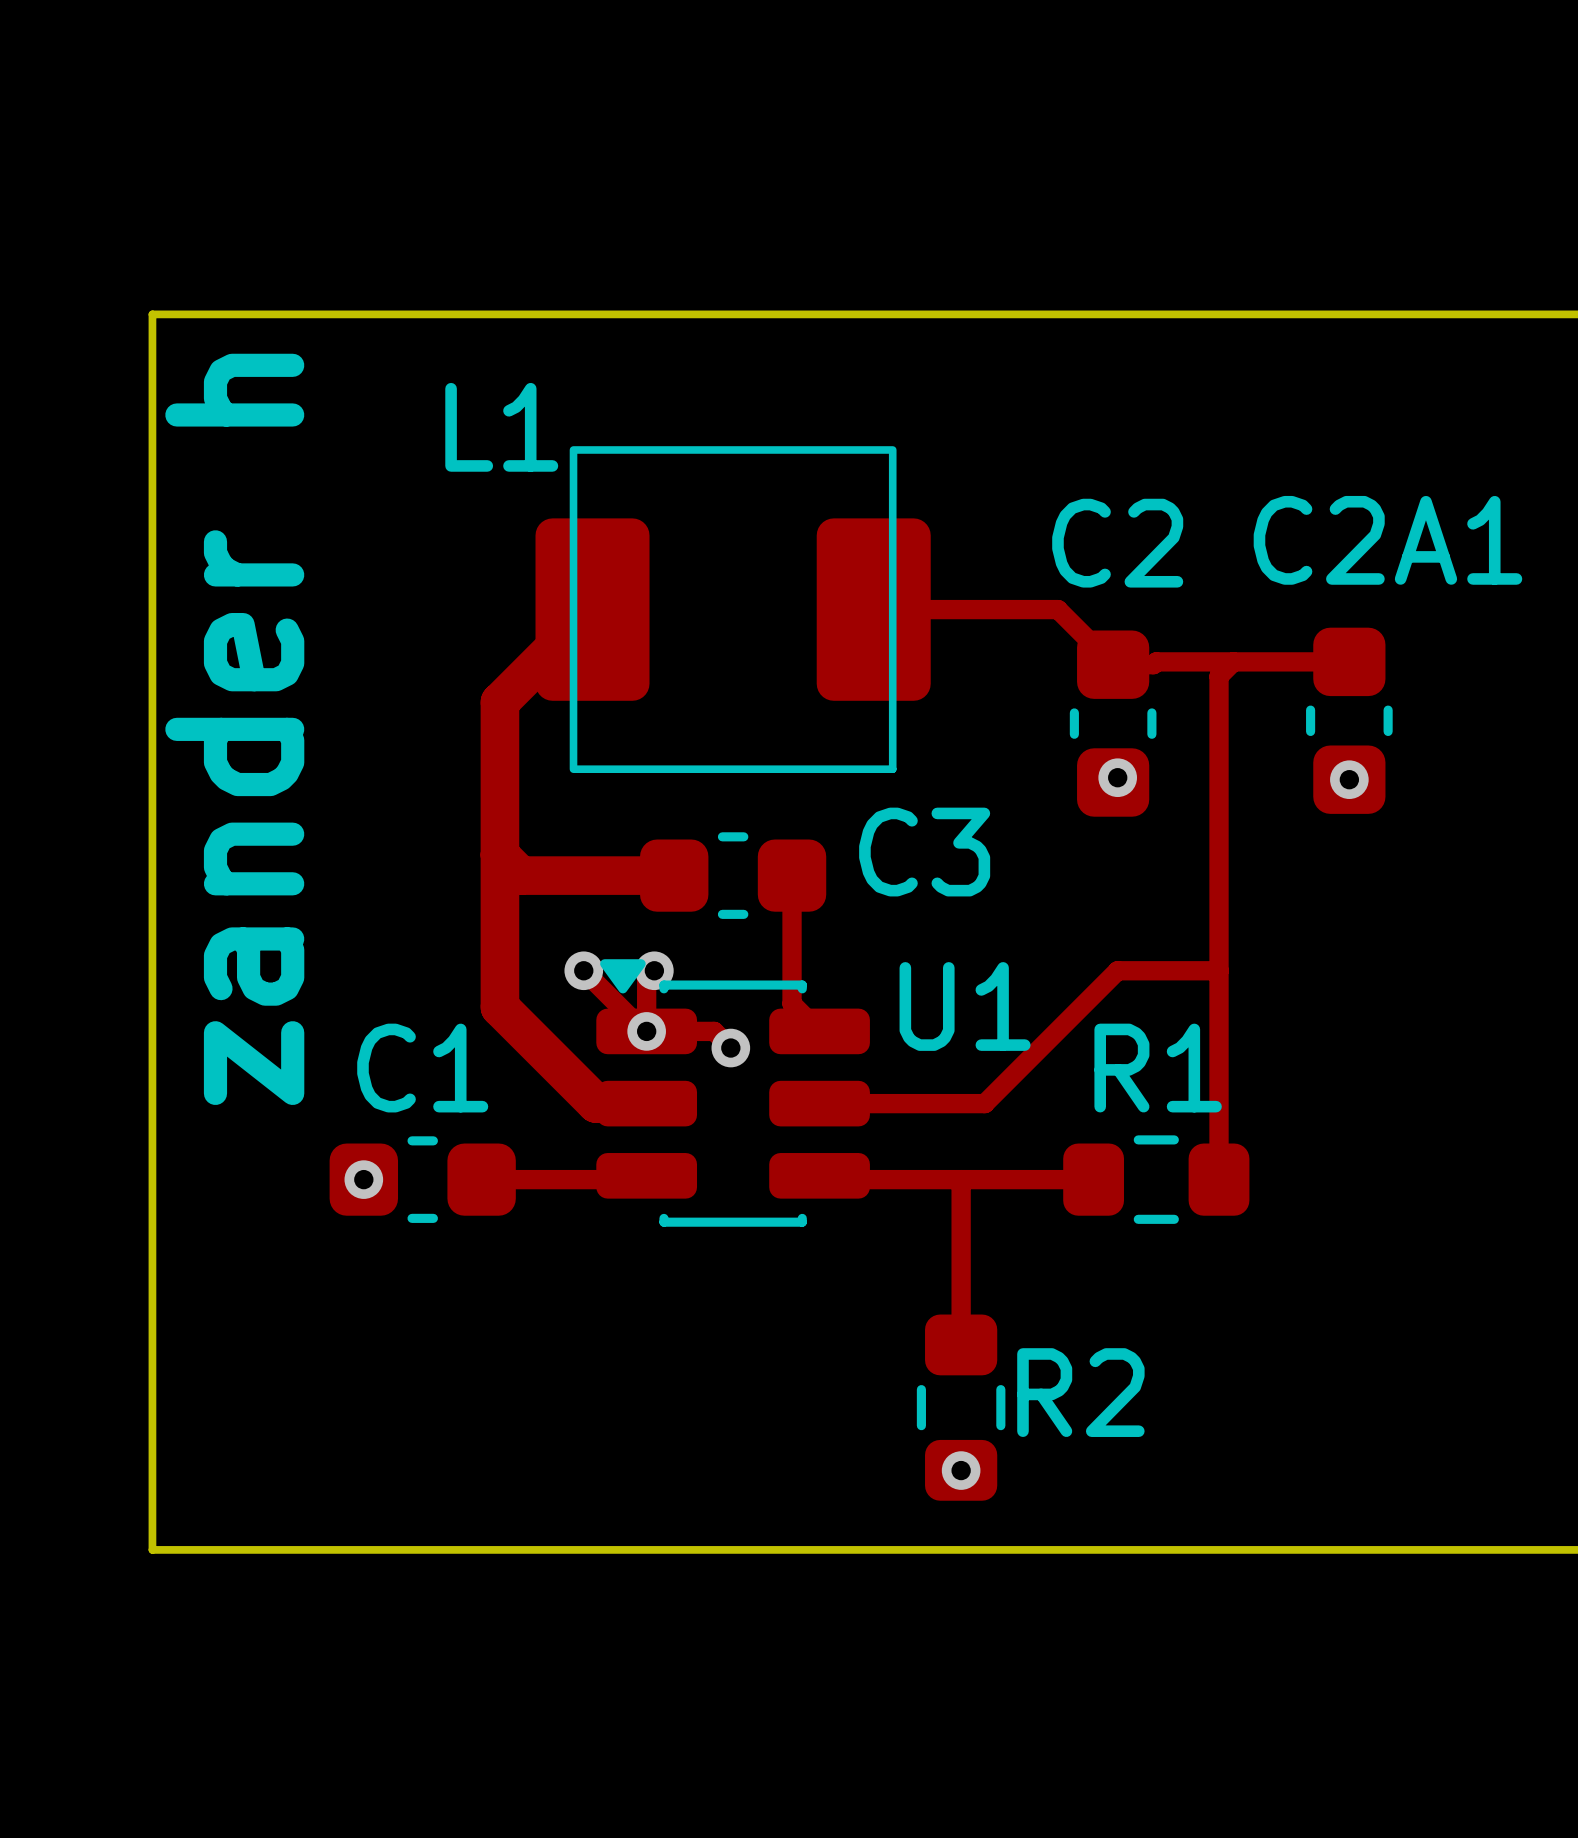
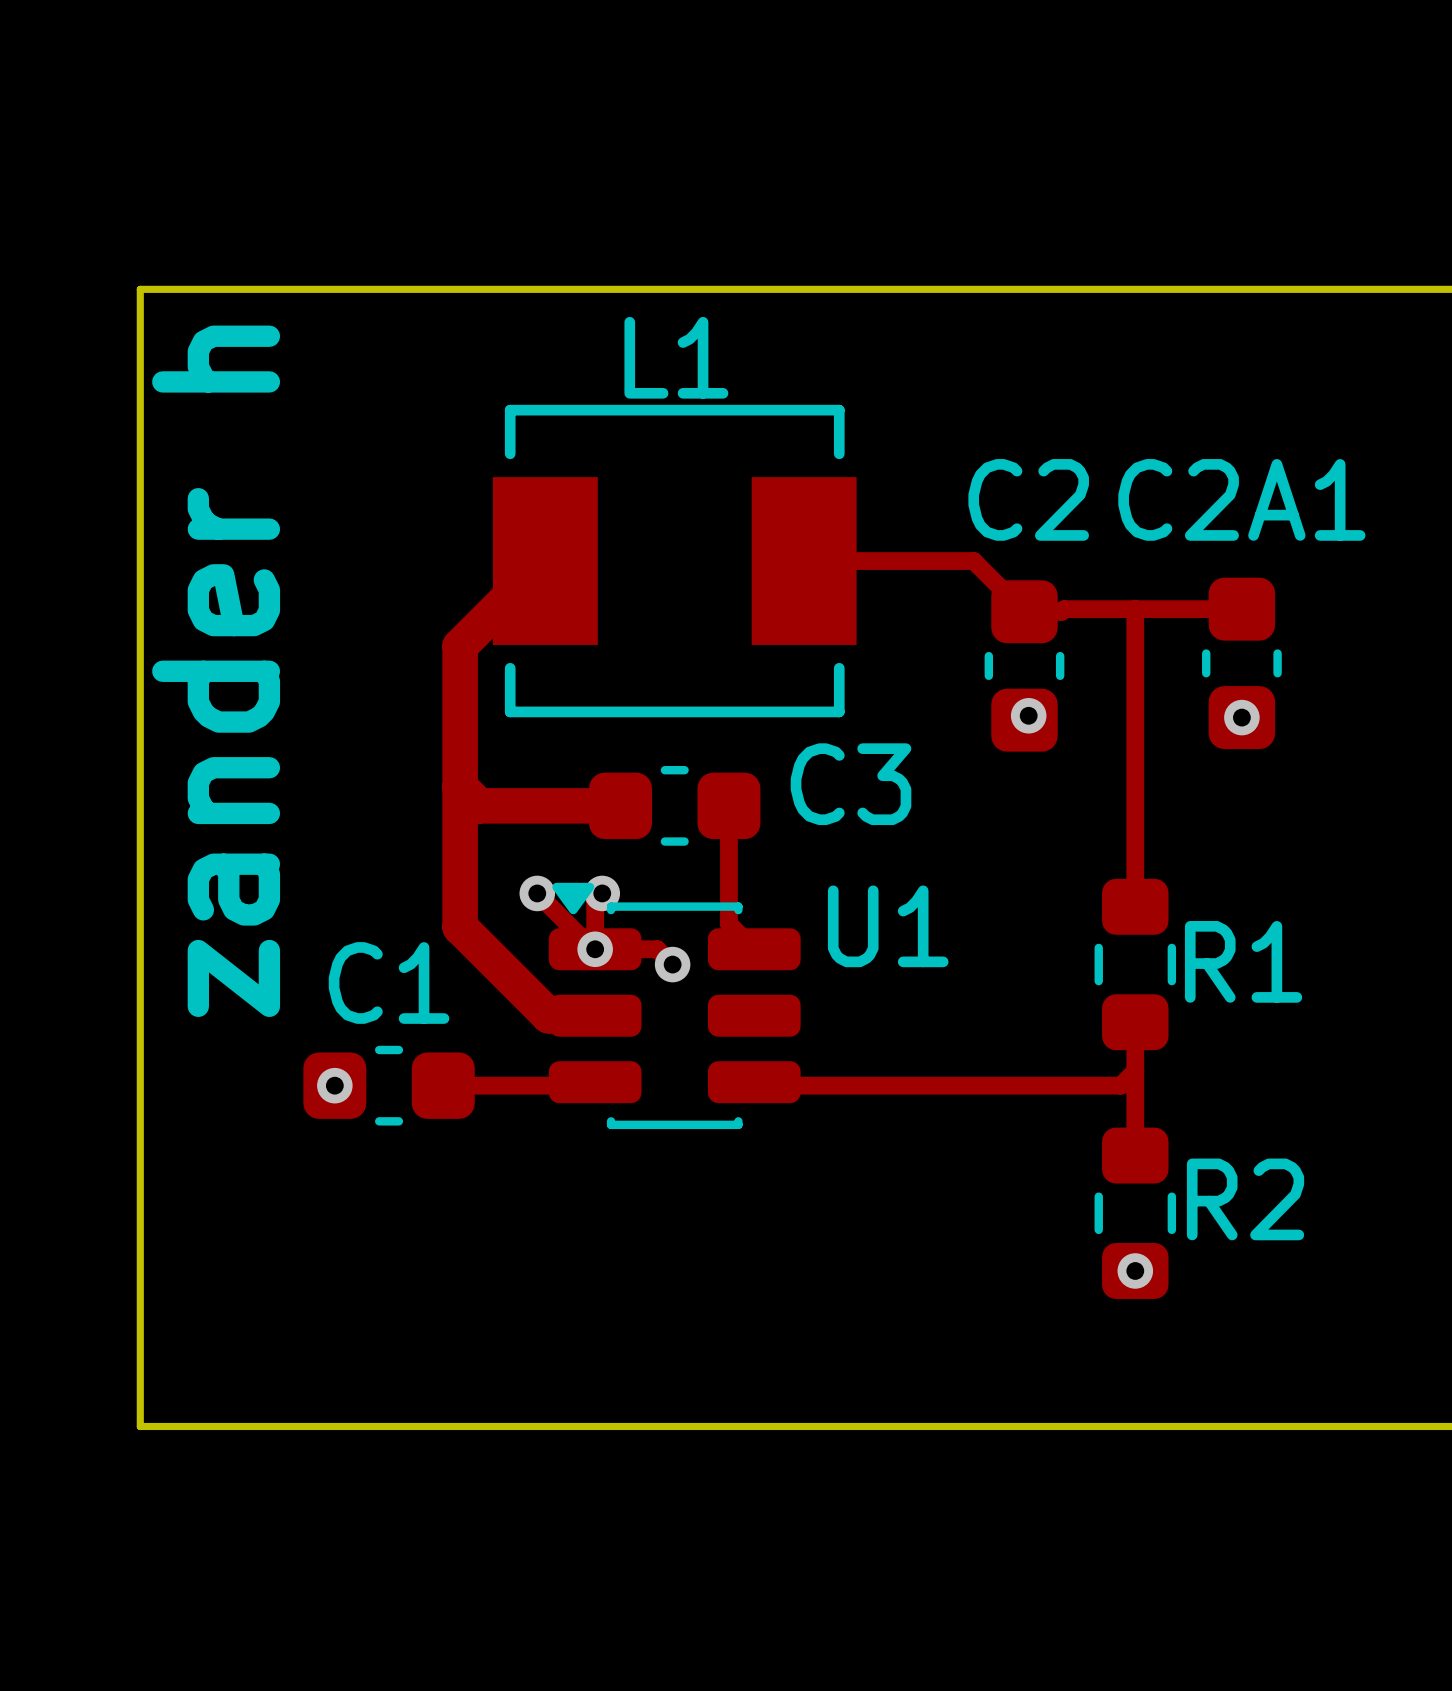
L1 name position: L1 (501, 427) -> L1 (676, 357)
L1 footprint: [535, 446, 931, 773] -> [492, 404, 857, 718]
C2A1 name position: C2A1 (1387, 540) -> C2A1 (1241, 499)
top track: (1233, 661) (1219, 676) (1219, 1179) -> (1135, 609) (1135, 906)
top track: (1219, 970) (1117, 970) (984, 1103) (819, 1103) -> none
top track: none -> (1135, 1022) (1135, 1155)
top track: none -> (1135, 1071) (1120, 1085) (1006, 1085)
top track: (961, 1179) (961, 1344) -> none
R1 rotation: 0° (1156, 1179) -> 90° clockwise (1135, 964)
R1 position: (1156, 1179) -> (1135, 964)
R2 position: (961, 1407) -> (1135, 1213)
via position: (961, 1470) -> (1135, 1270)

